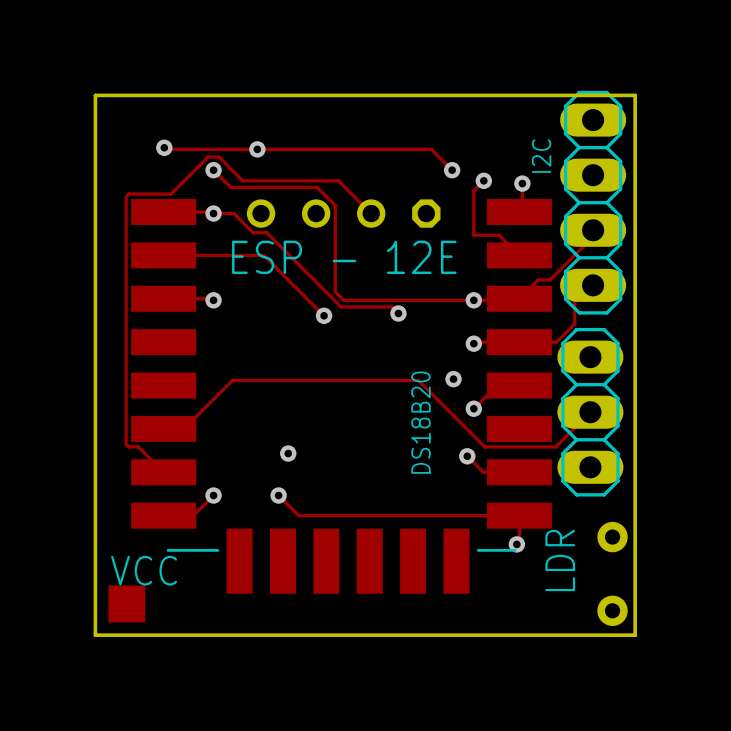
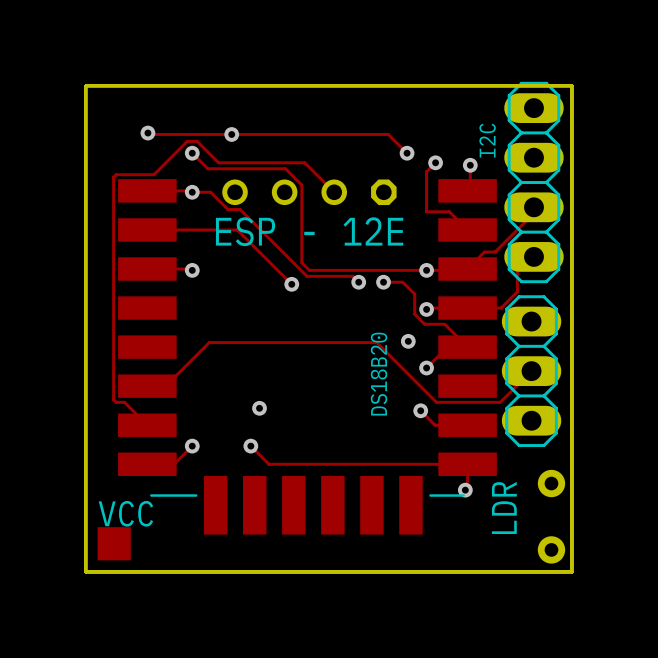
track: none -> (383, 282) (402, 282) (414, 294) (414, 314) (424, 324) (444, 324) (467, 347)
via: none -> (383, 282)

